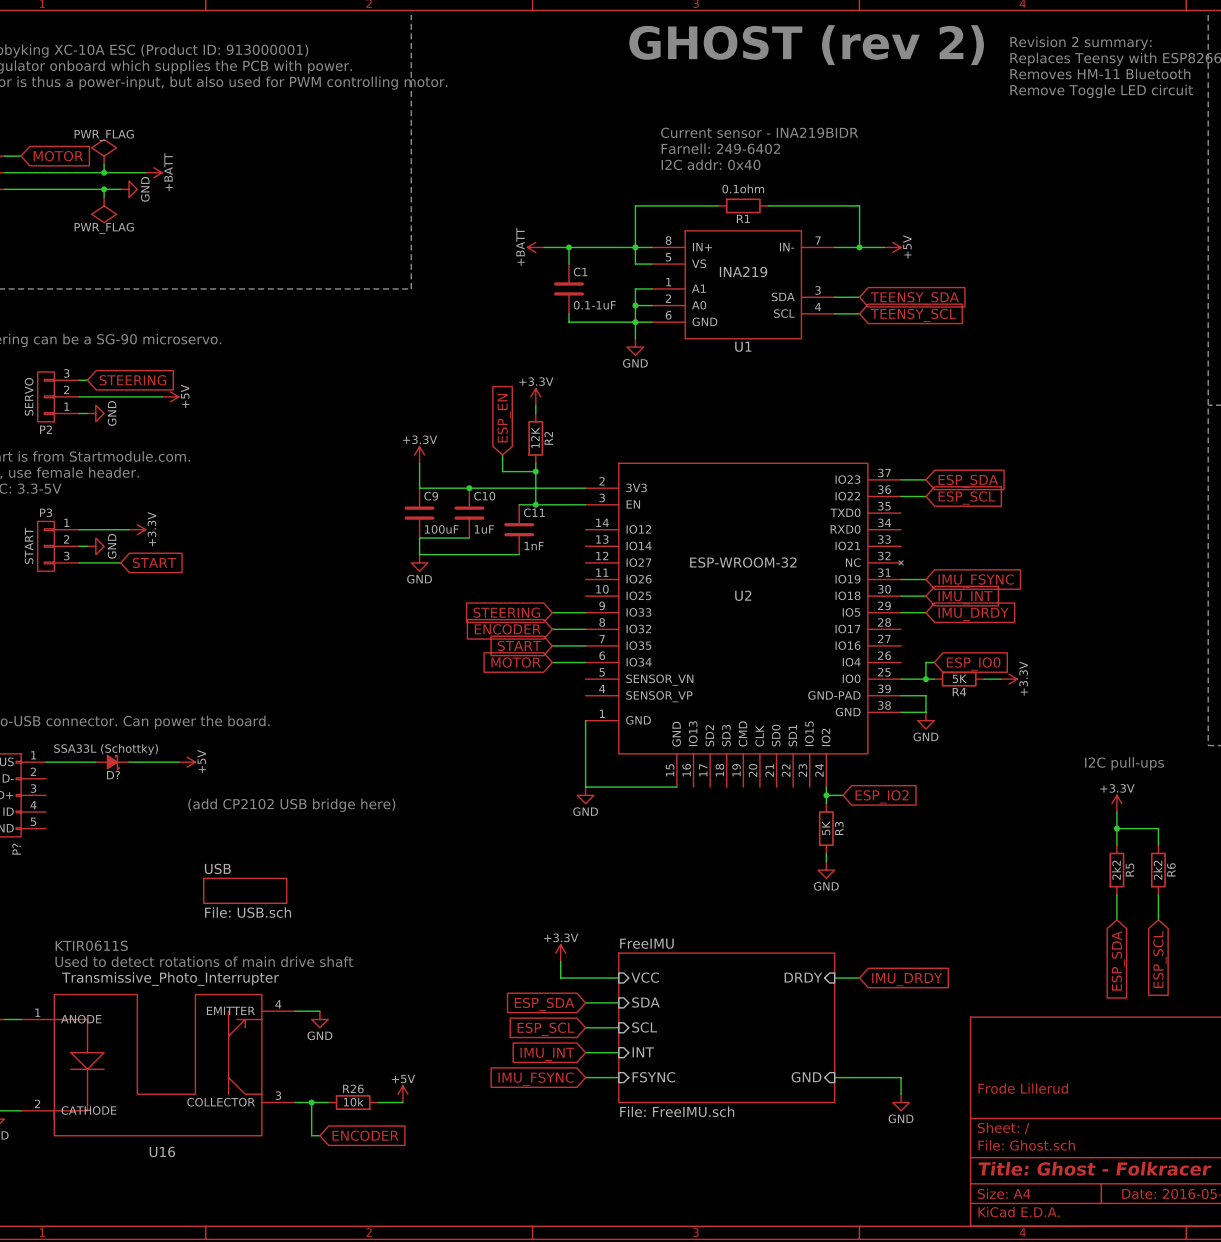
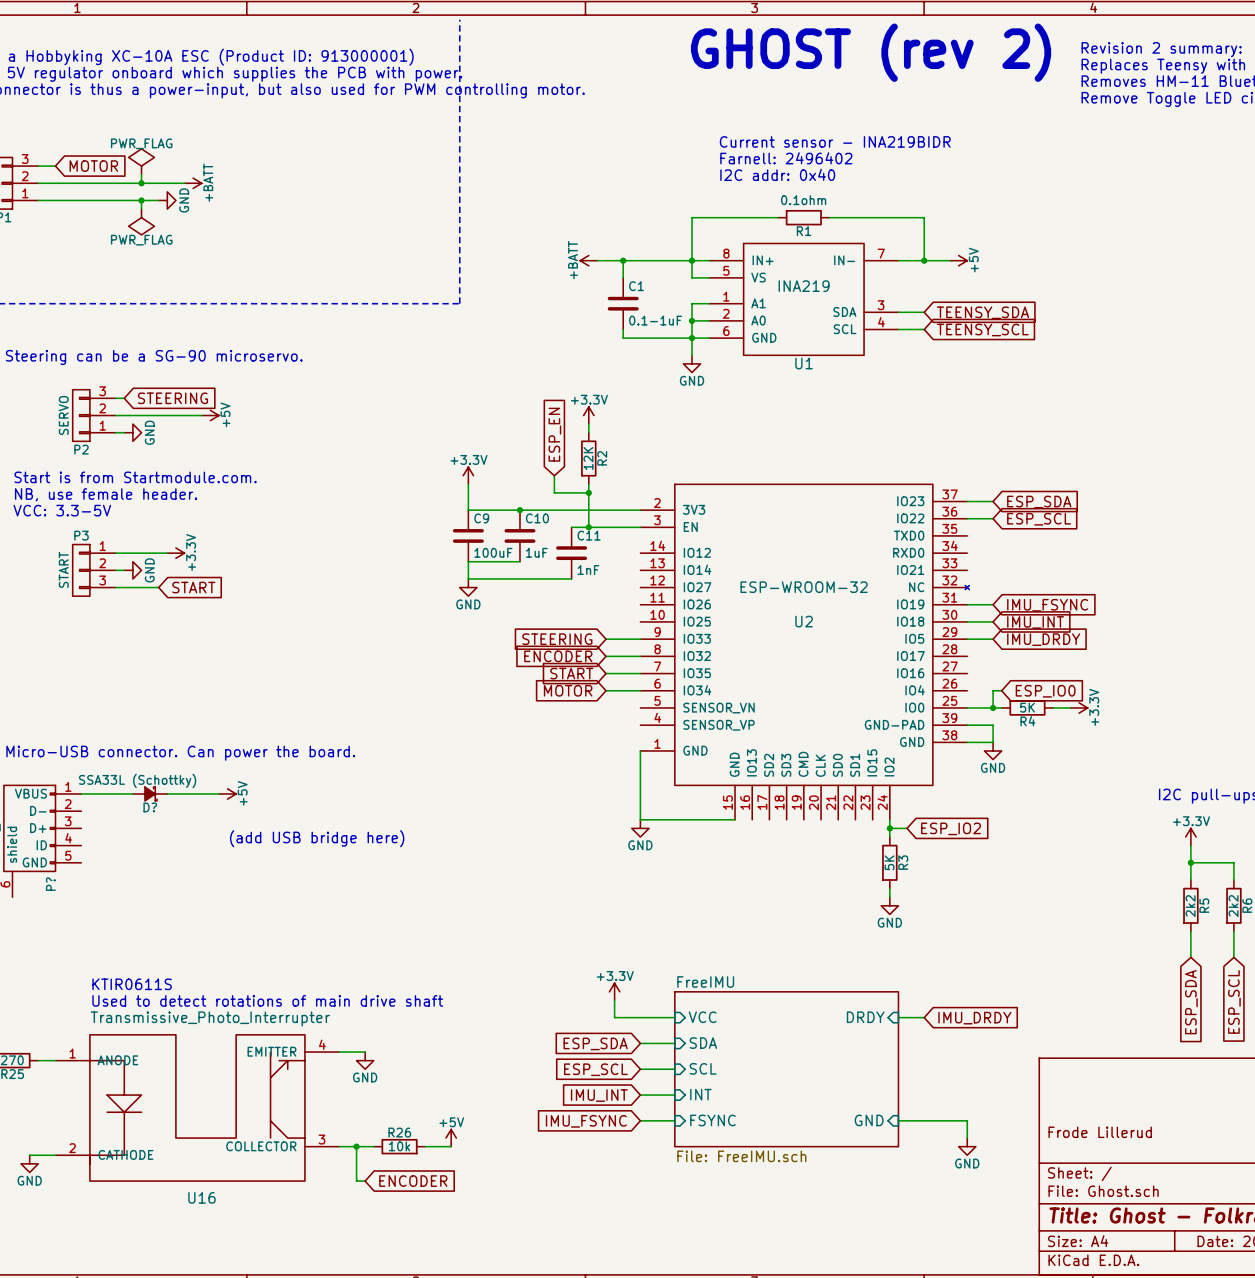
text: Farnell: 249-6402 (720, 148) -> Farnell: 2496402 (786, 158)
text: (add CP2102 USB bridge here) (291, 805) -> (add USB bridge here) (317, 838)
sheet USB: File: USB.sch (245, 890) -> none

